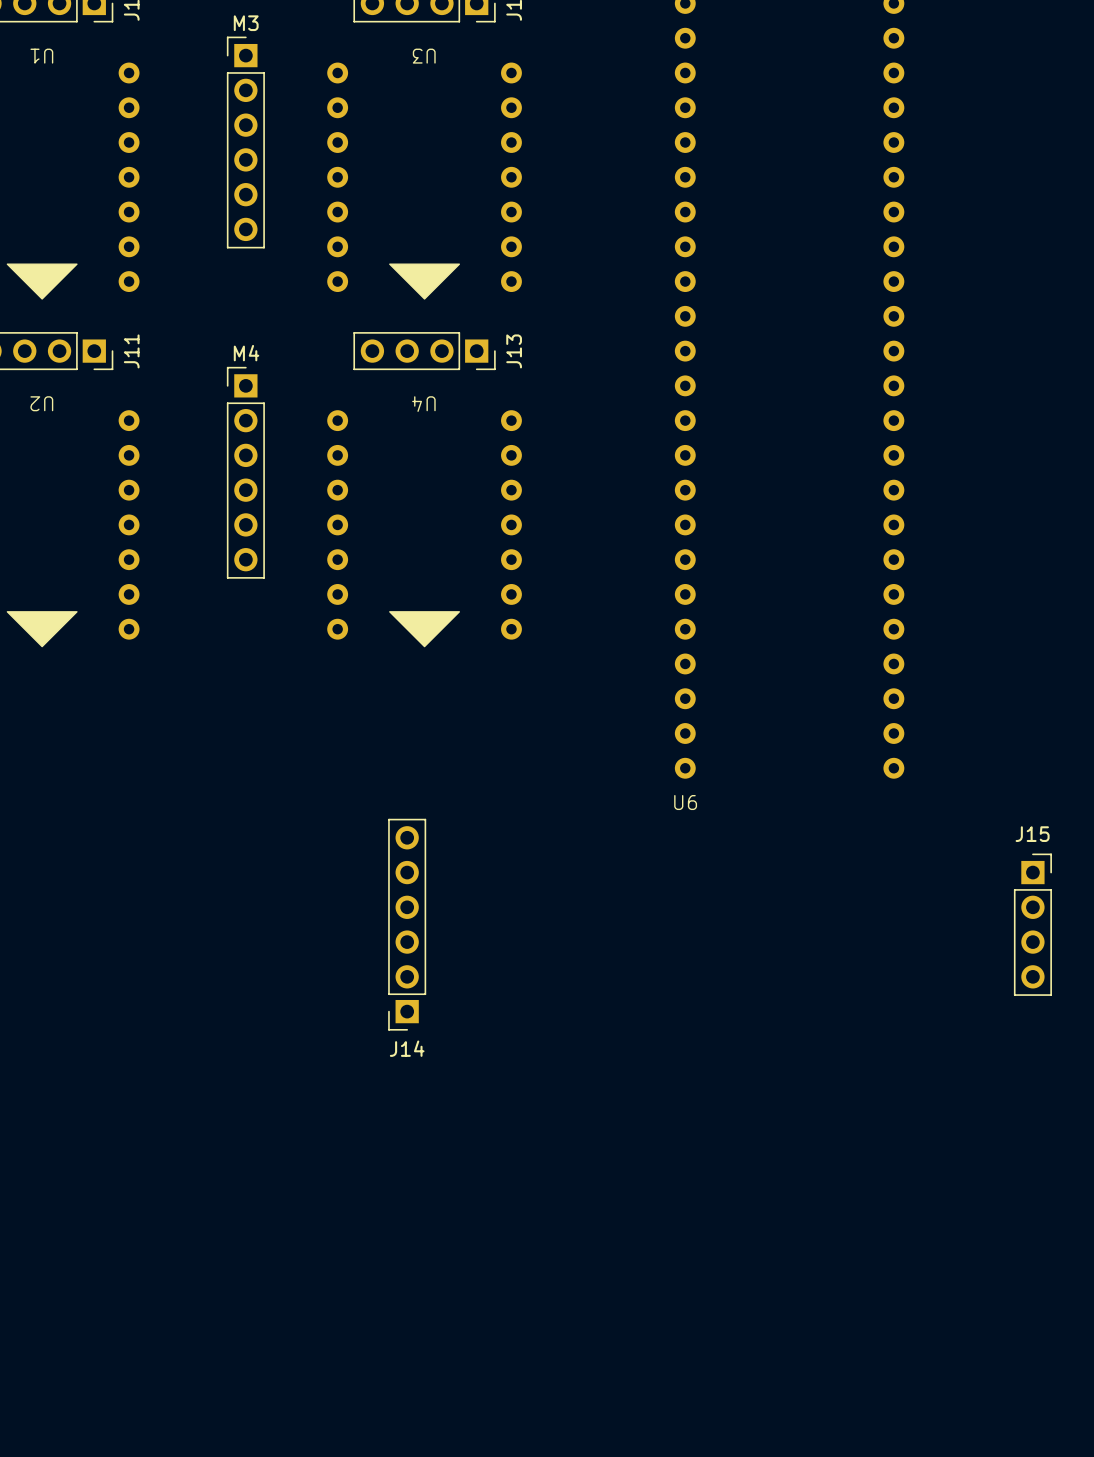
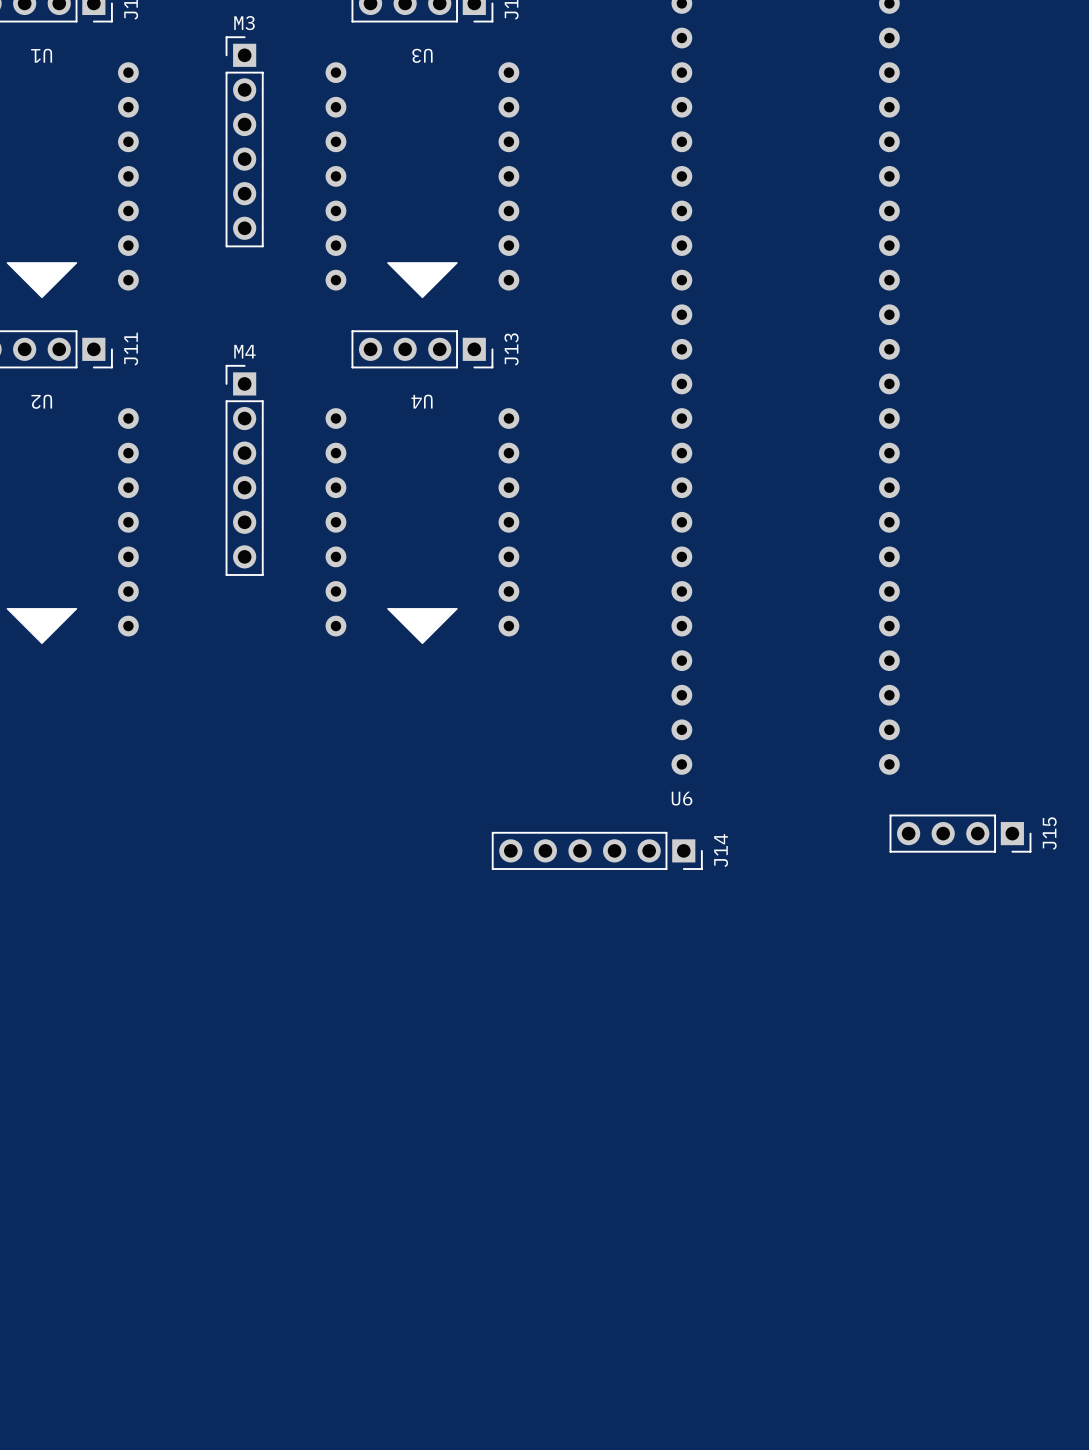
J14 rotation: 0° (407, 924) -> 90° counterclockwise (597, 850)
J14 position: (407, 924) -> (597, 850)
J15 rotation: 0° (1032, 924) -> 90° clockwise (960, 833)
J15 position: (1032, 924) -> (960, 833)

